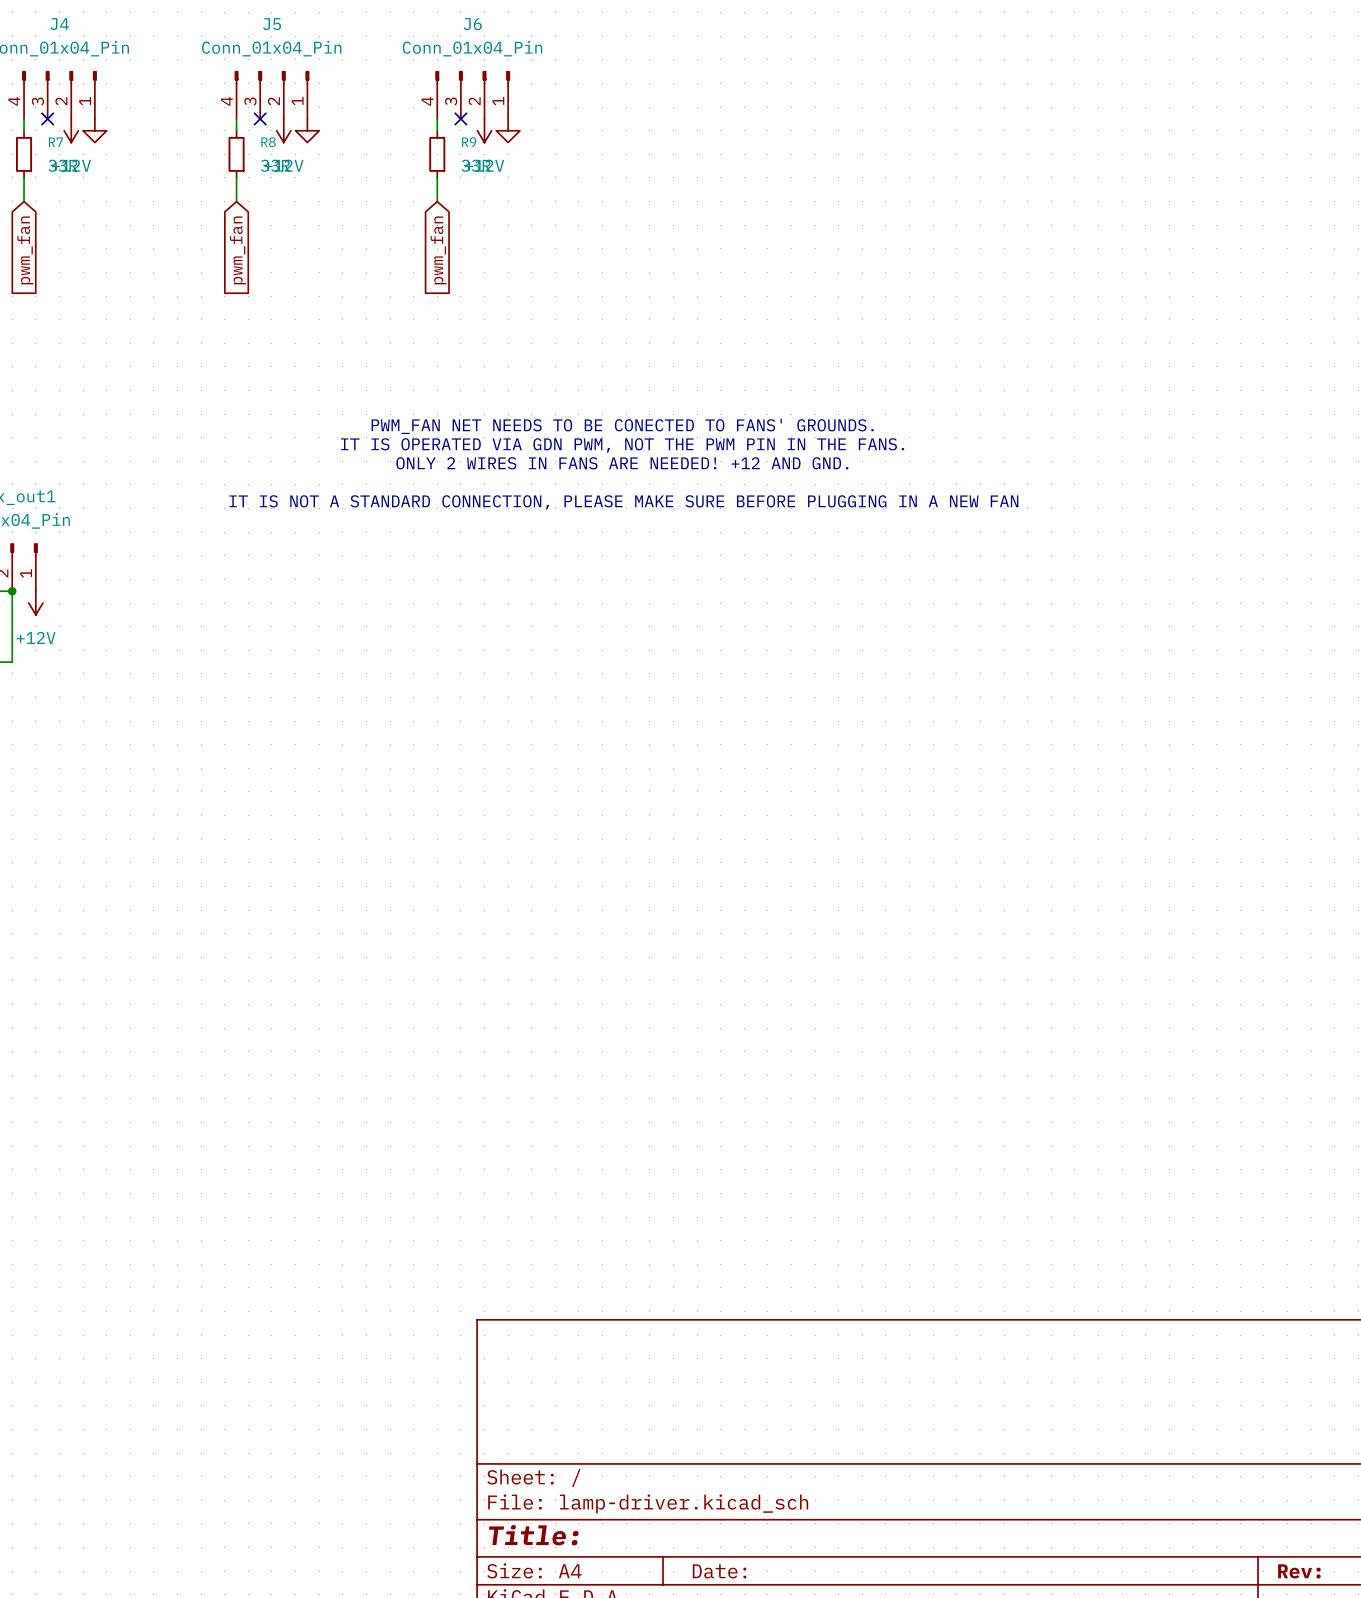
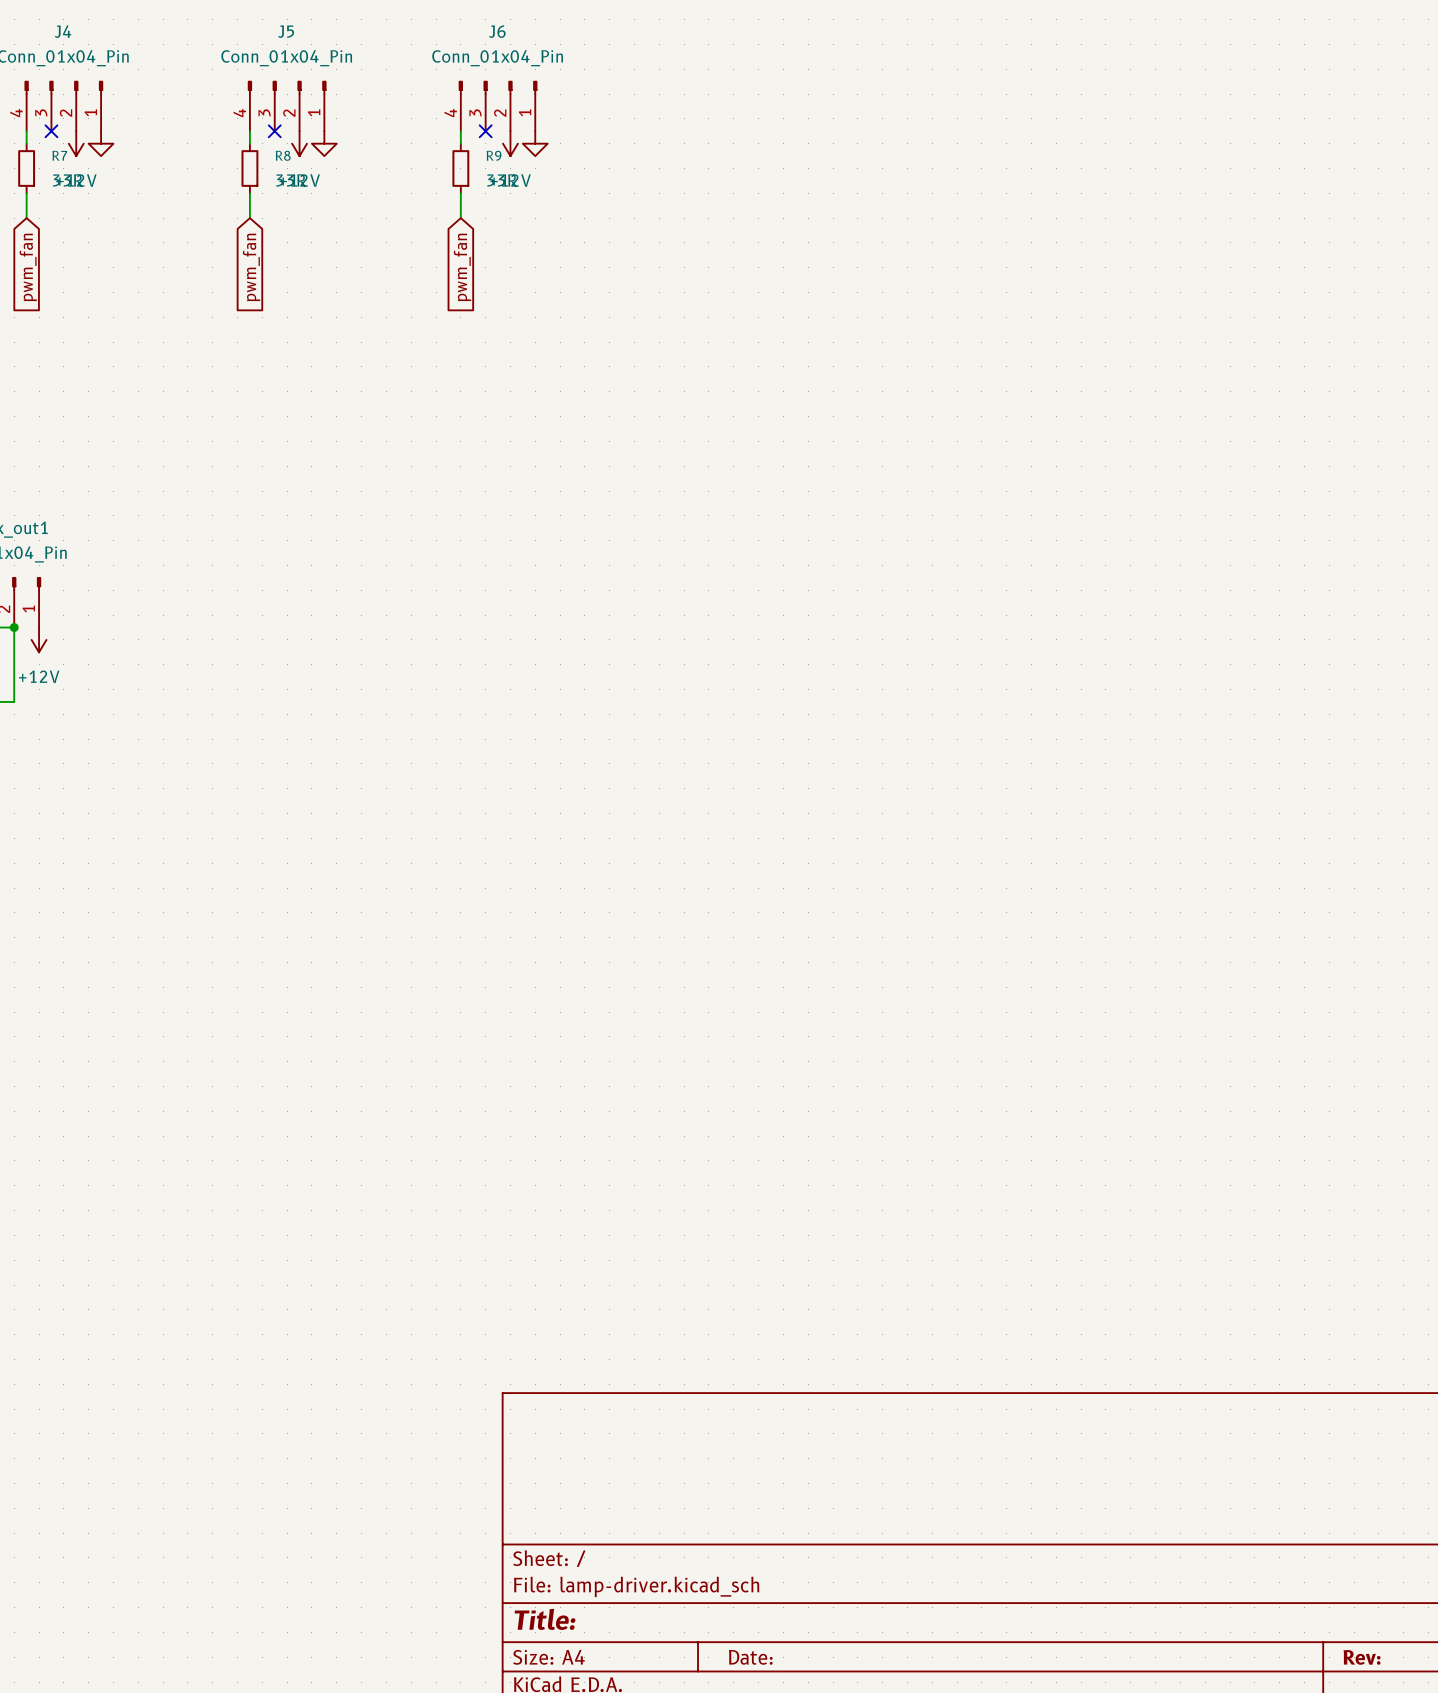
text: PWM_FAN NET NEEDS TO BE CONECTED TO FANS' GROUNDS. (622, 426) -> none
text: IT IS OPERATED VIA GDN PWM, NOT THE PWM PIN IN THE FANS. (622, 445) -> none
text: ONLY 2 WIRES IN FANS ARE NEEDED! +12 AND GND. (622, 463) -> none
text: IT IS NOT A STANDARD CONNECTION, PLEASE MAKE SURE BEFORE PLUGGING IN A NEW FAN (623, 502) -> none

